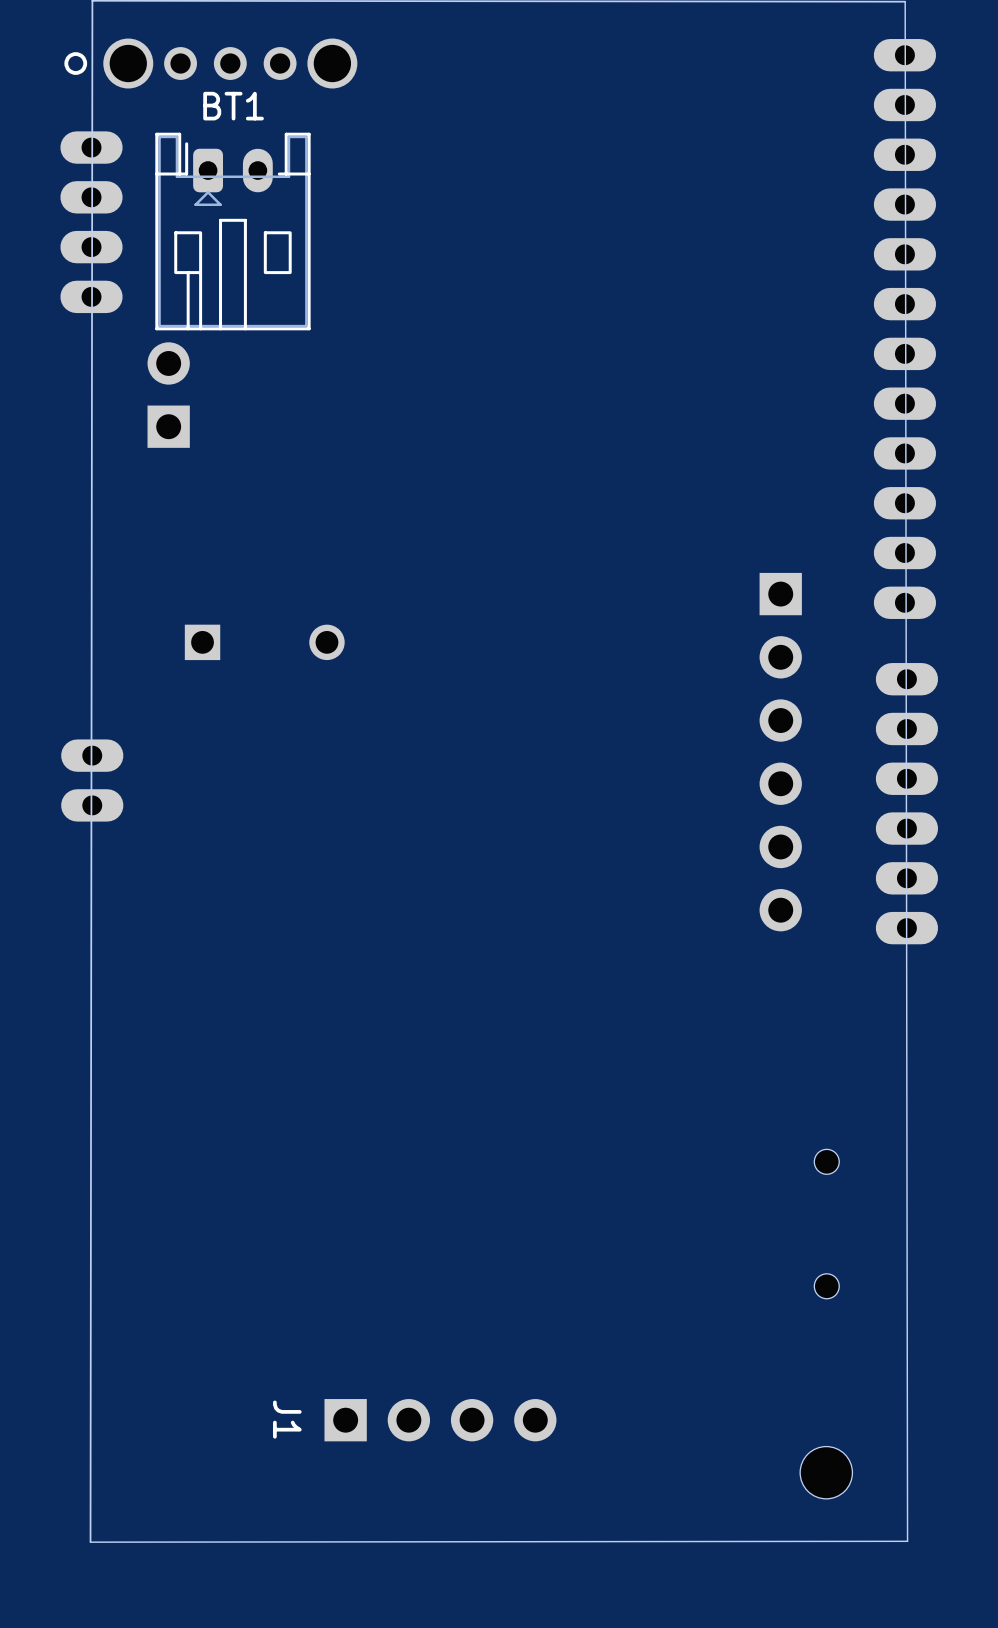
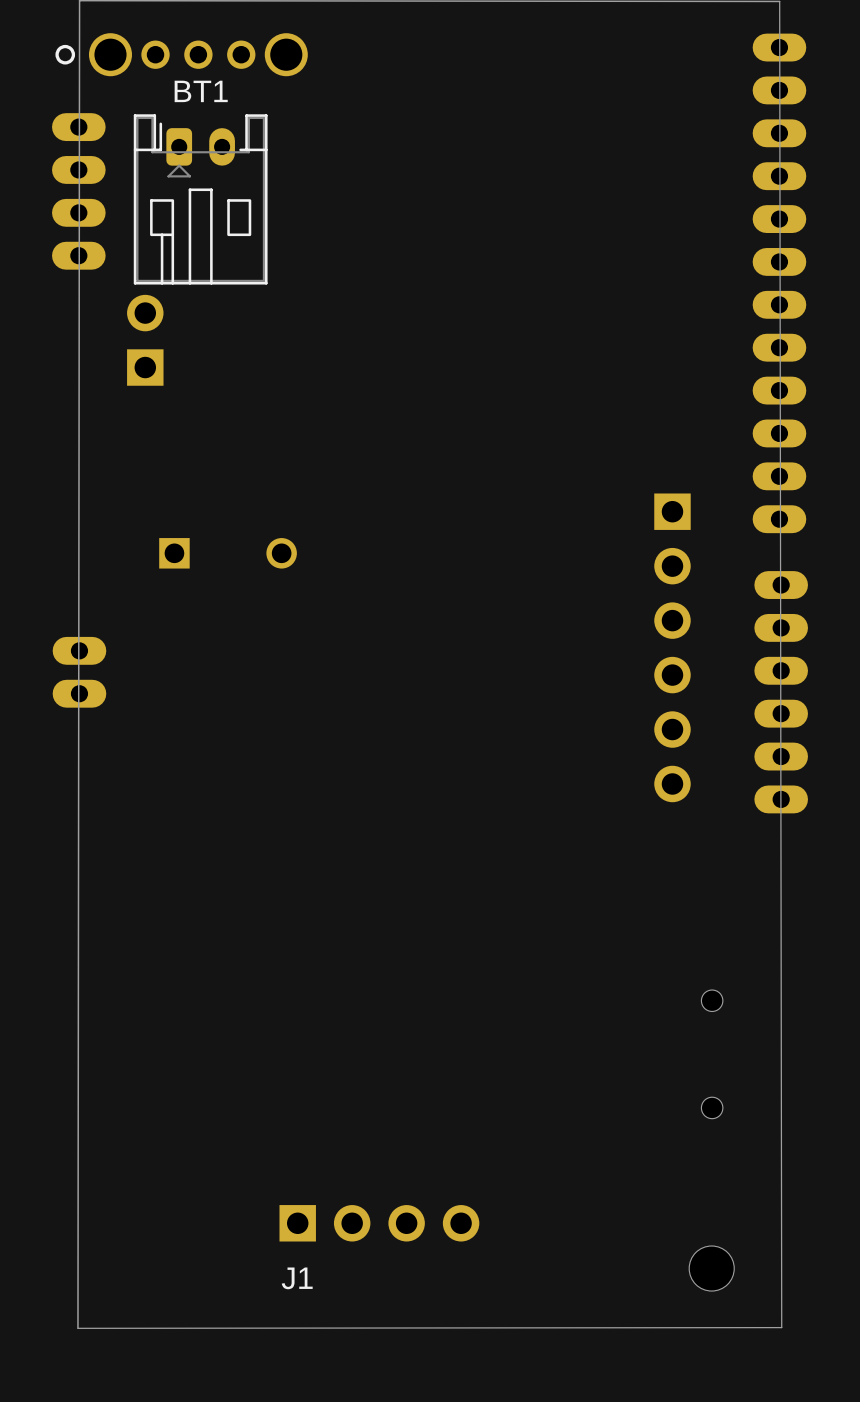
J1 name rotation: 0° (287, 1419) -> 90° counterclockwise (297, 1278)
J1 name position: J1 (287, 1419) -> J1 (297, 1278)

